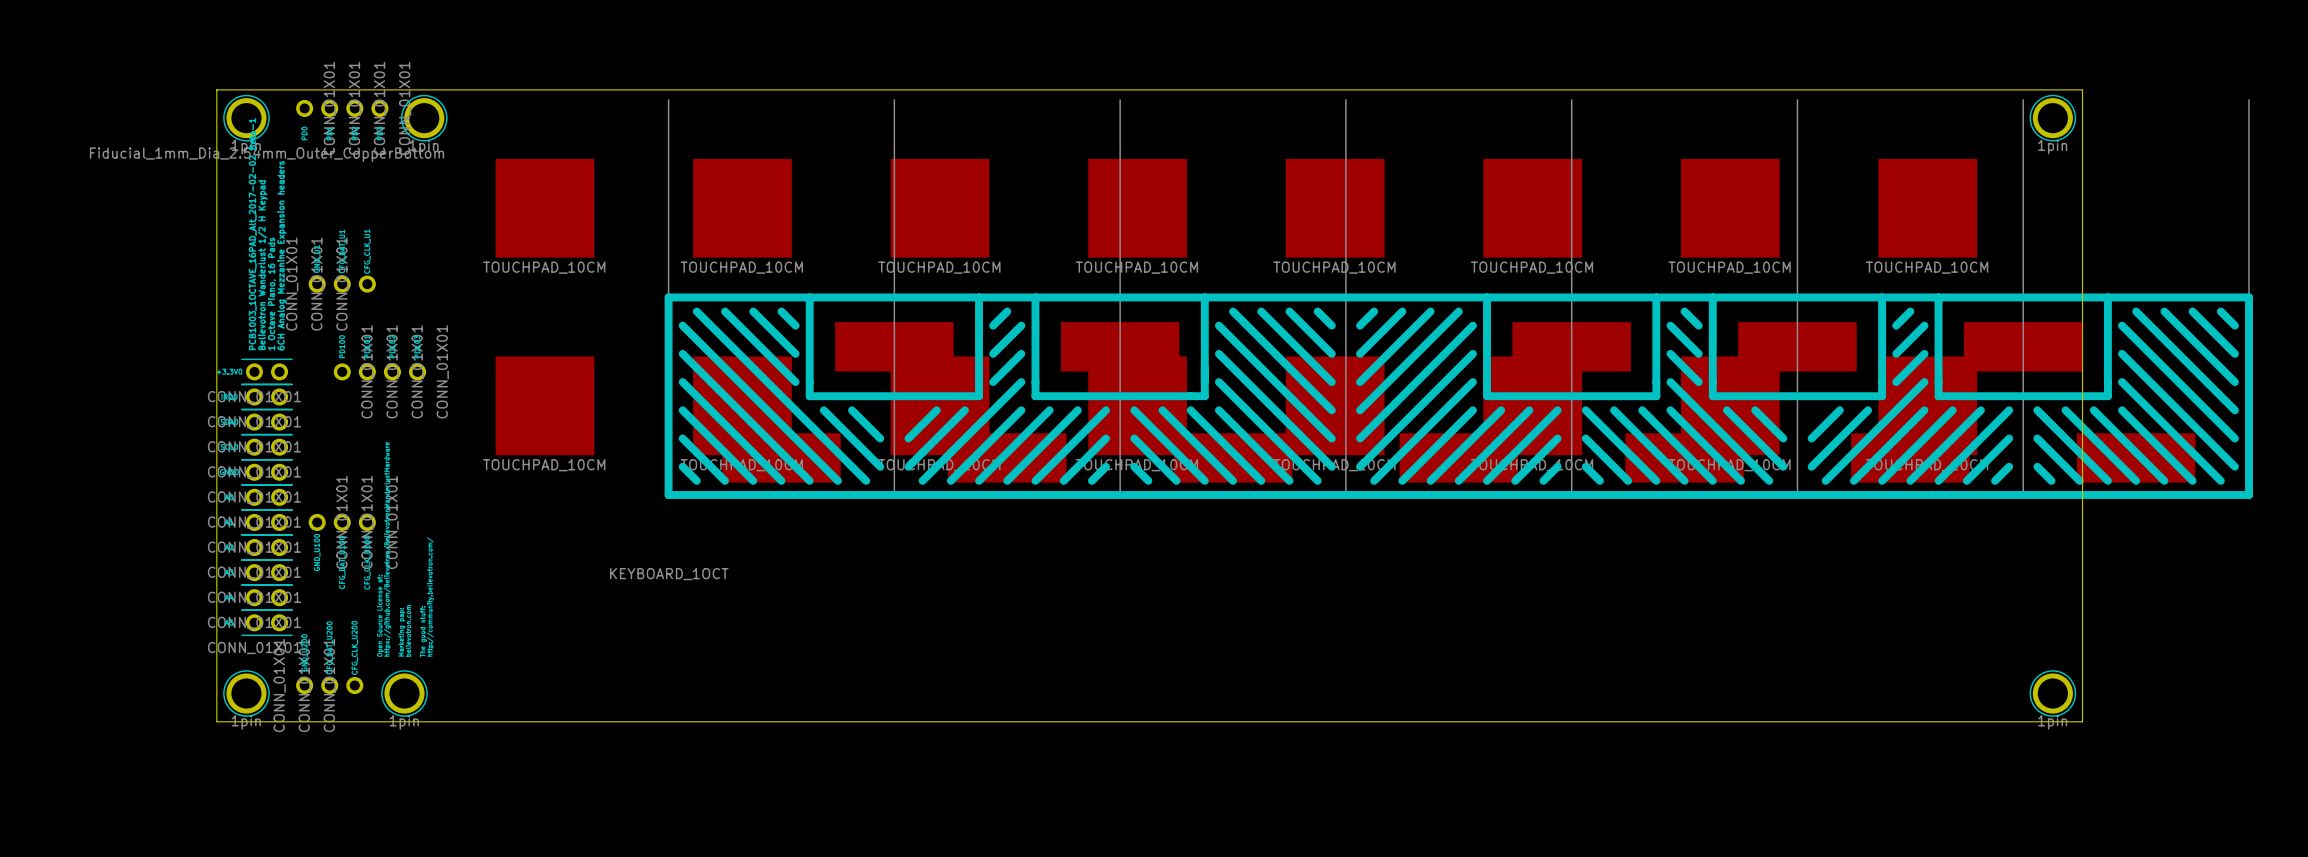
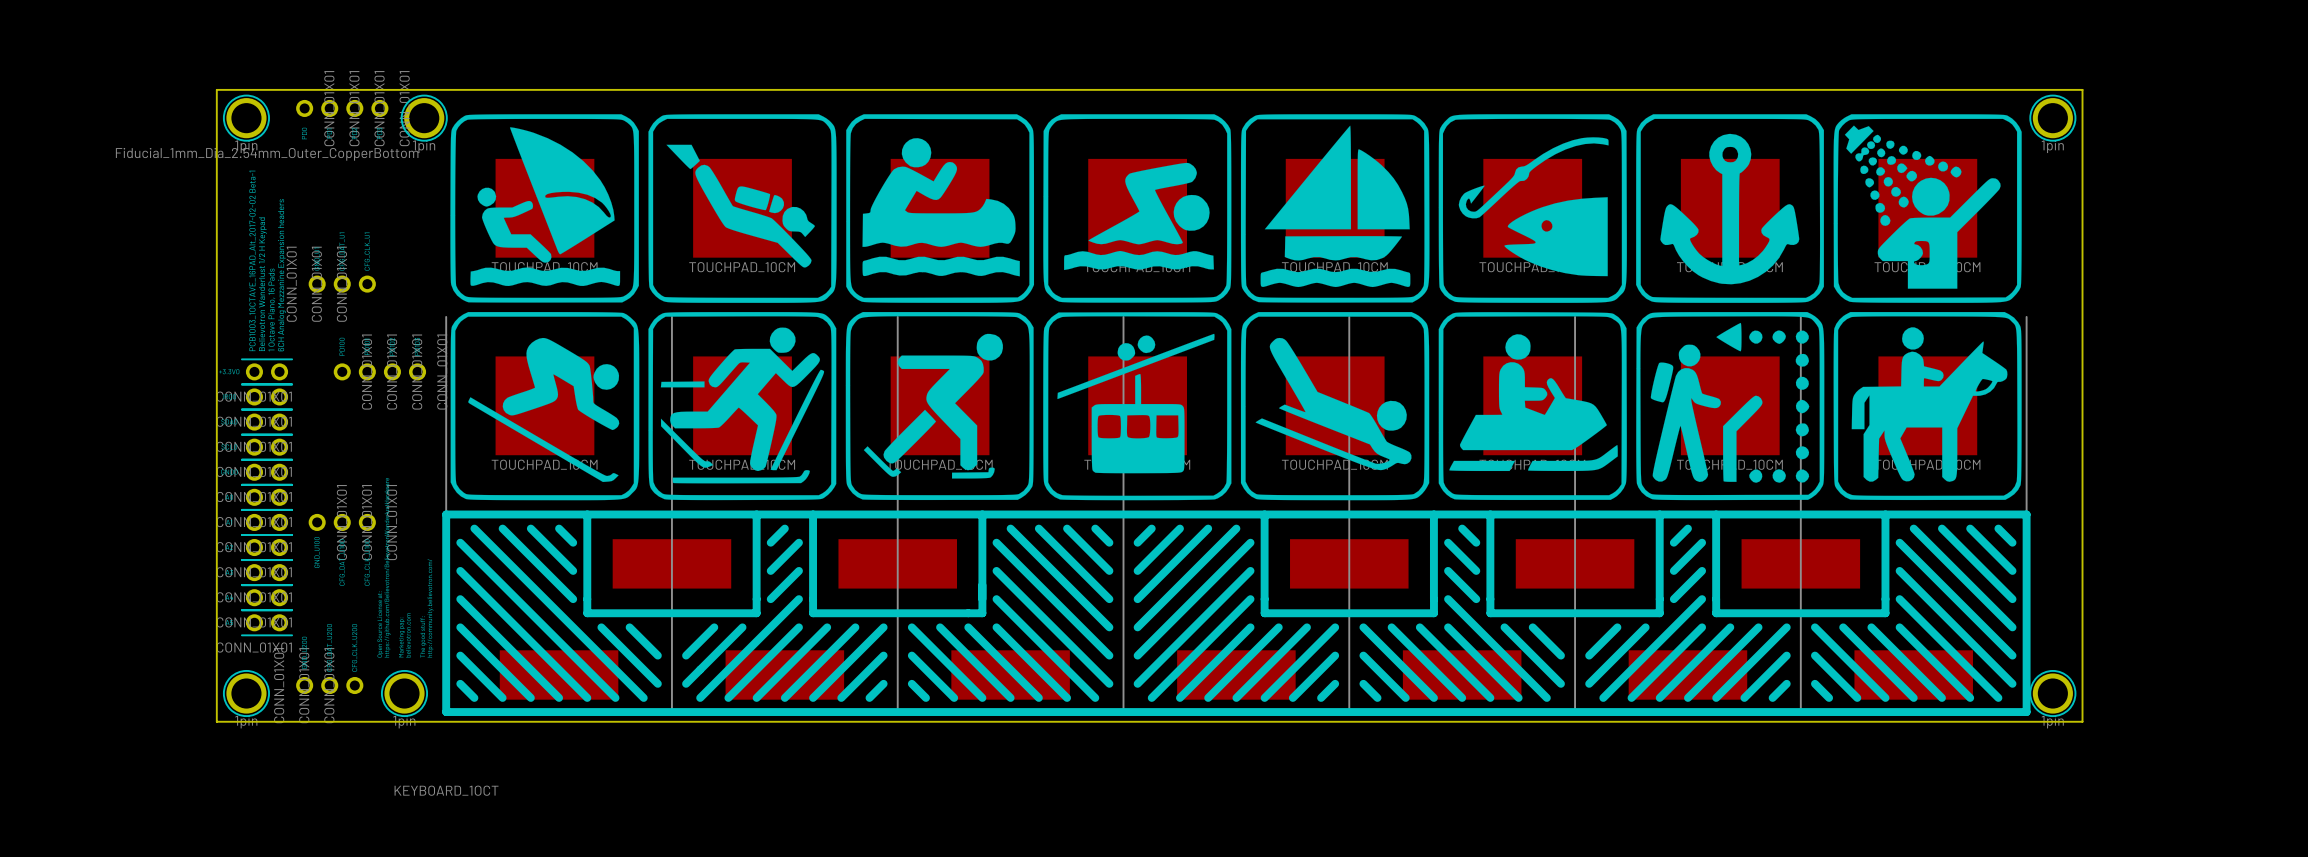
drawing: none -> [450, 114, 2022, 501]
part: KEYBOARD_1OCT (1458, 299) -> none
part: none -> KEYBOARD_1OCT (1236, 516)

